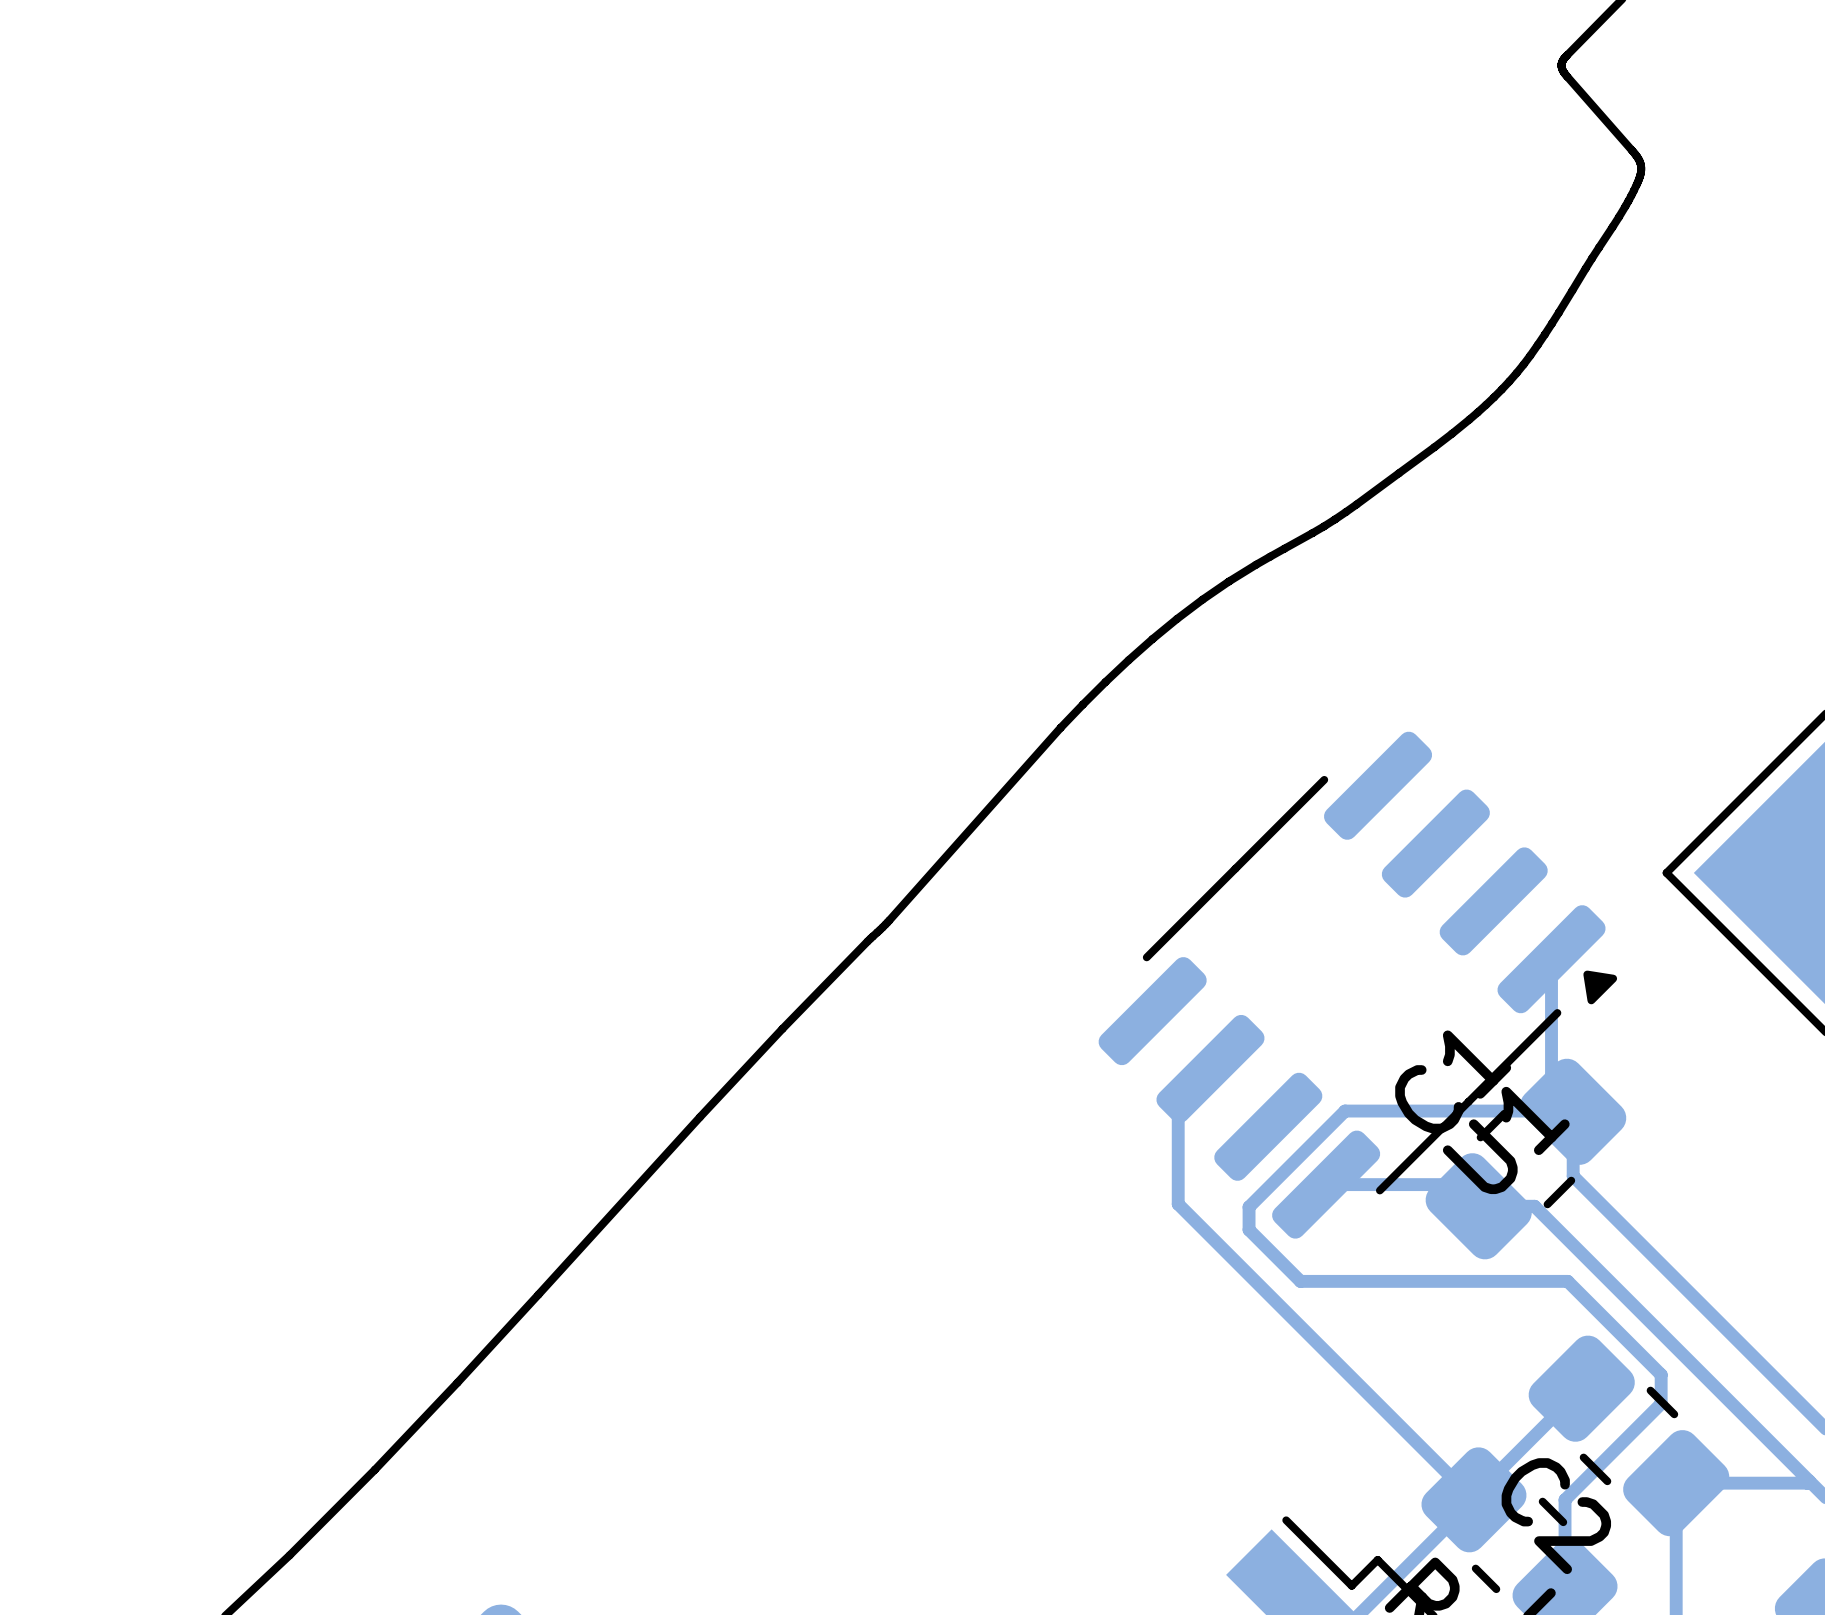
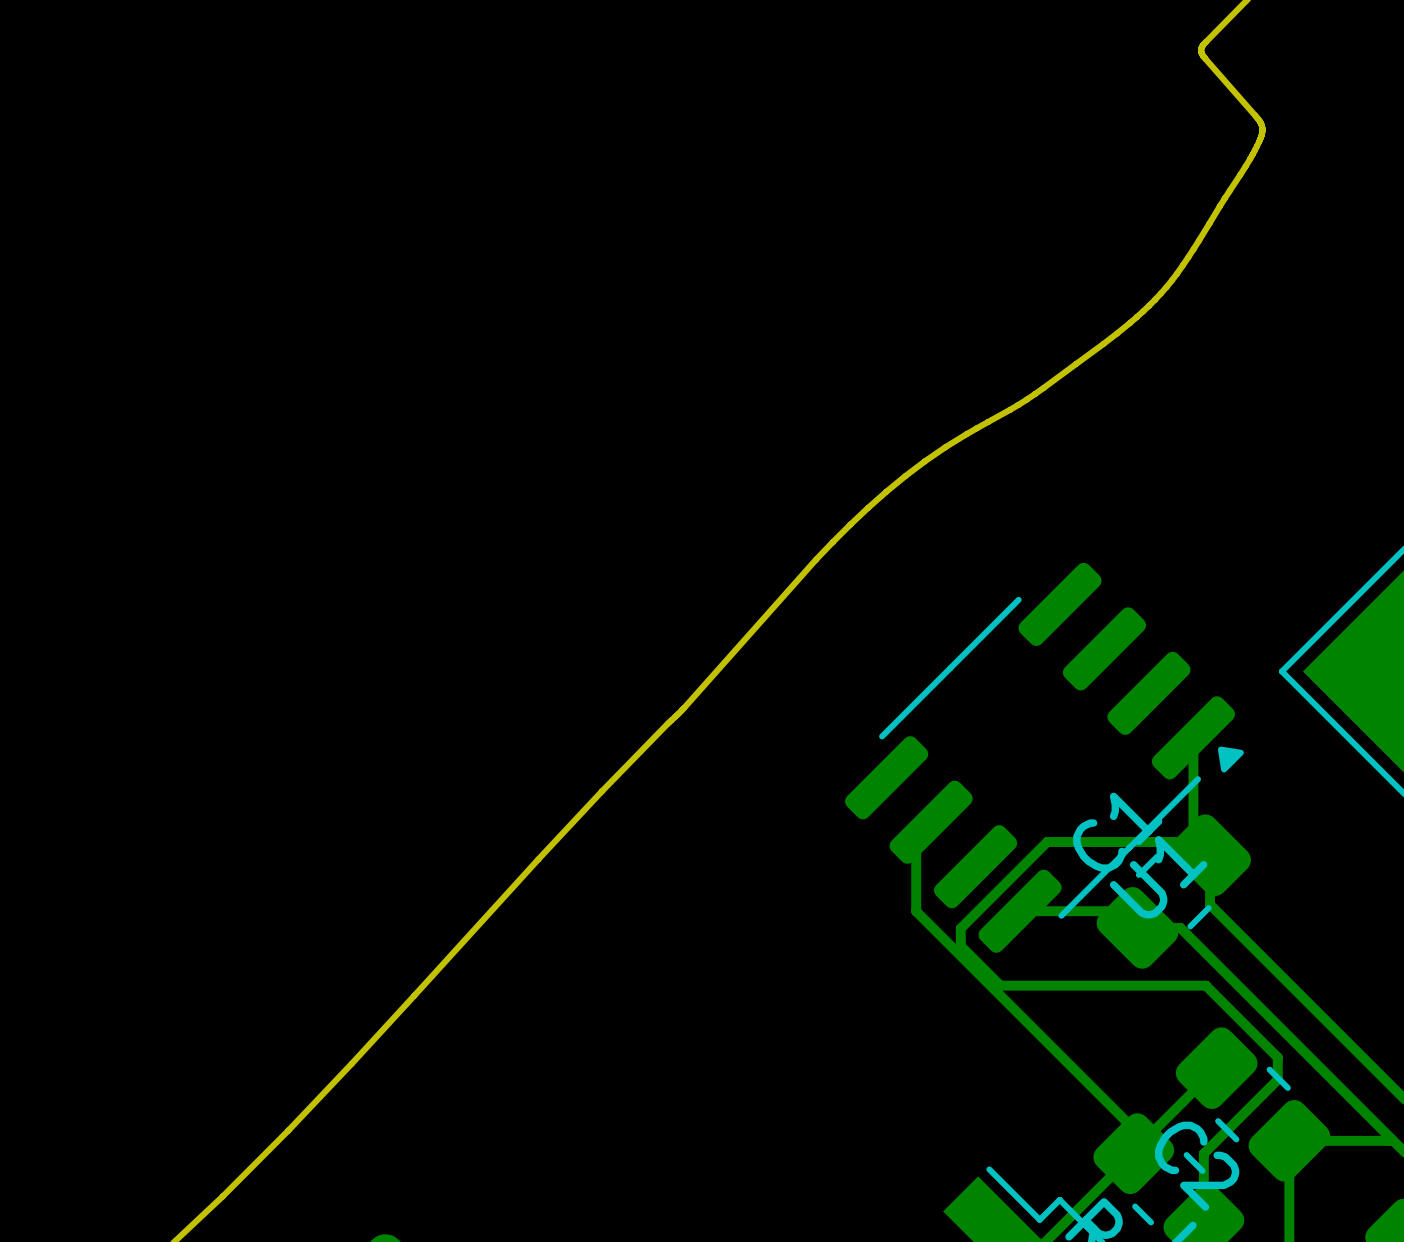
track: (1191, 1088) (1178, 1101) (1178, 1204) (1473, 1499) -> (916, 837) (916, 911) (1133, 1128) (1133, 1151)
track: (1572, 1111) (1345, 1111) -> (1216, 842) (1047, 842) (1034, 854)

